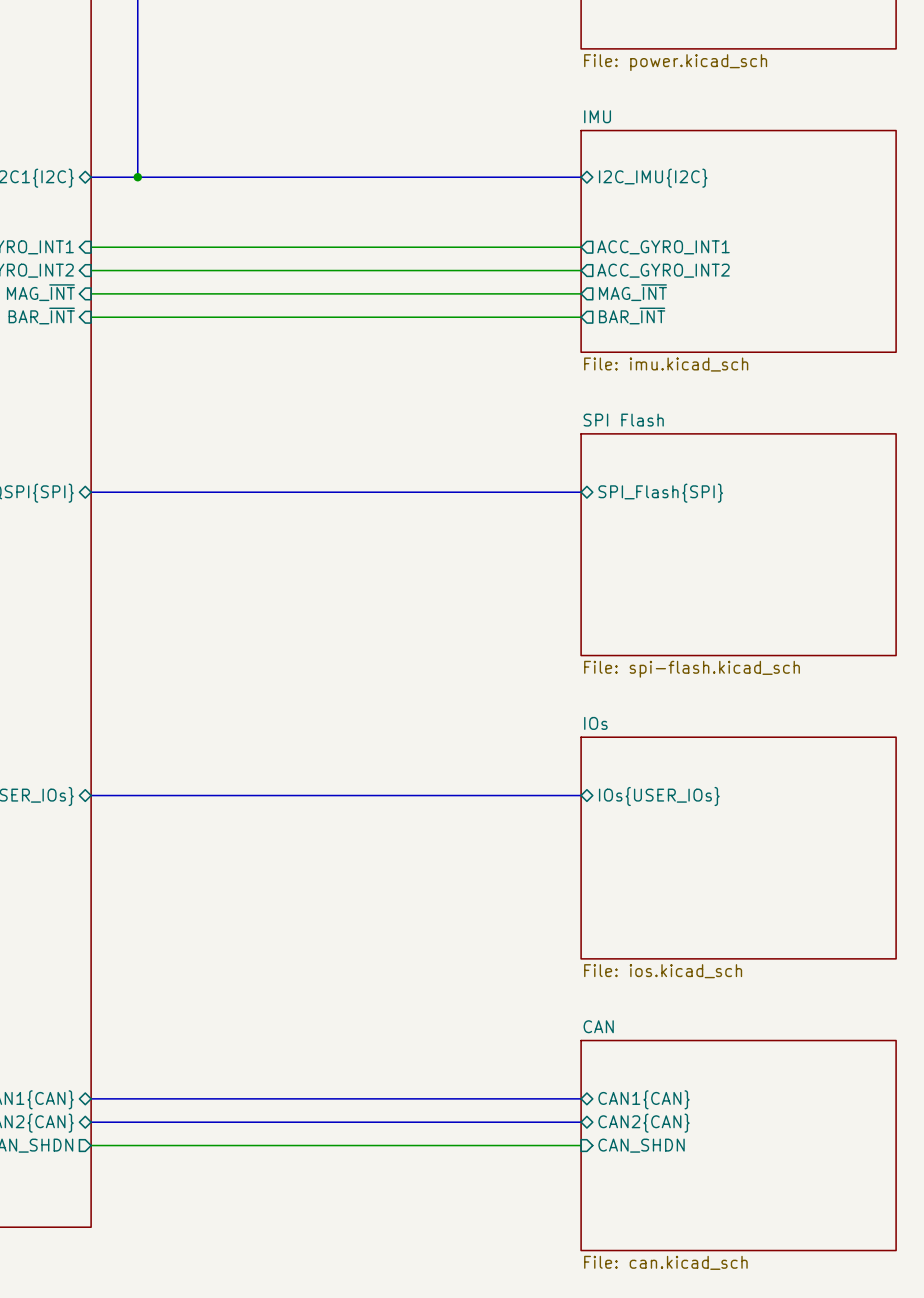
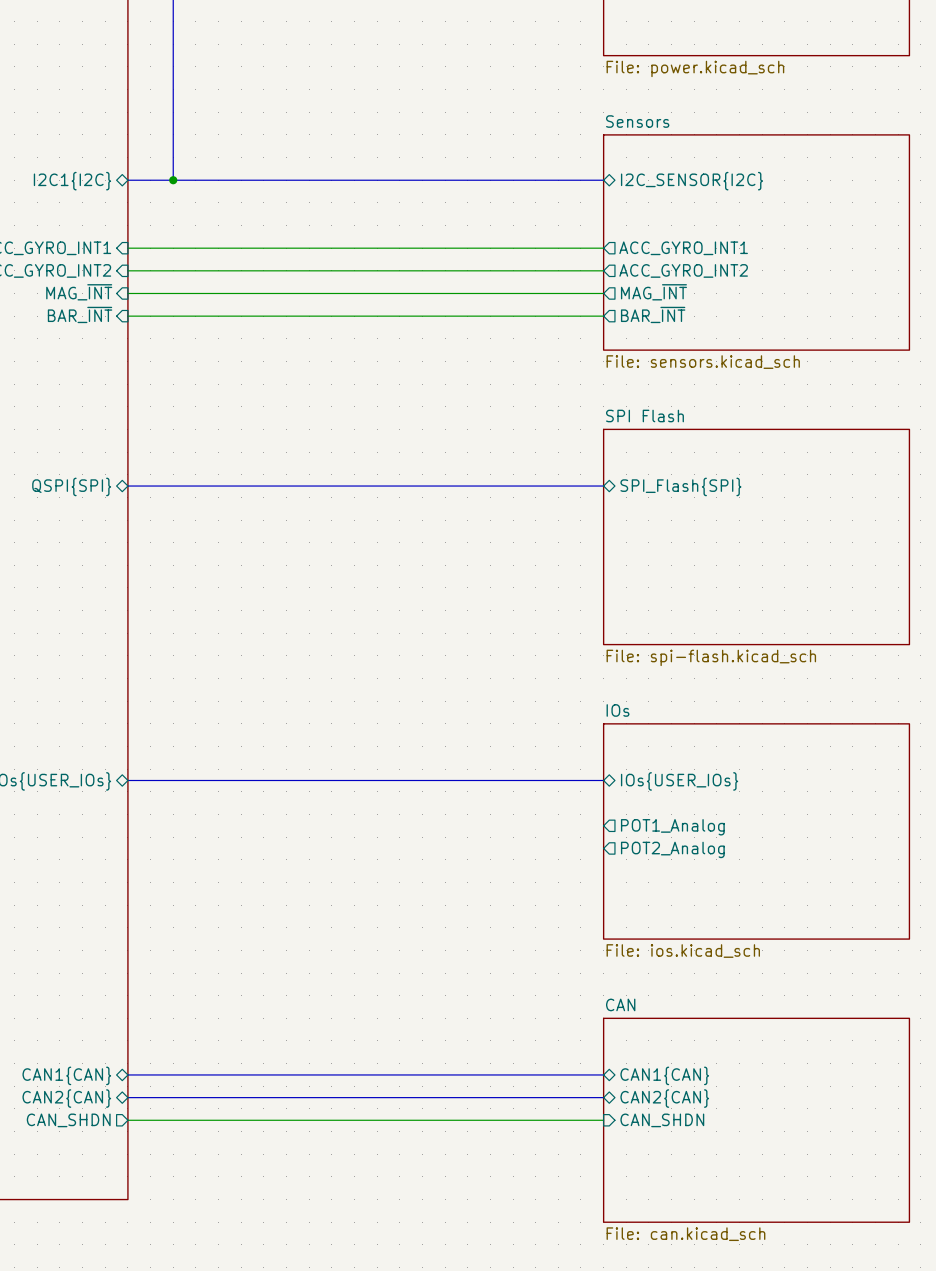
sheet IMU name: IMU (597, 116) -> Sensors (637, 121)
sheet pin: I2C_IMU{I2C} (653, 178) -> I2C_SENSOR{I2C} (691, 181)
sheet IMU value: File: imu.kicad_sch (666, 364) -> File: sensors.kicad_sch (703, 362)
sheet pin: none -> POT1_Analog (672, 827)
sheet pin: none -> POT2_Analog (672, 849)

